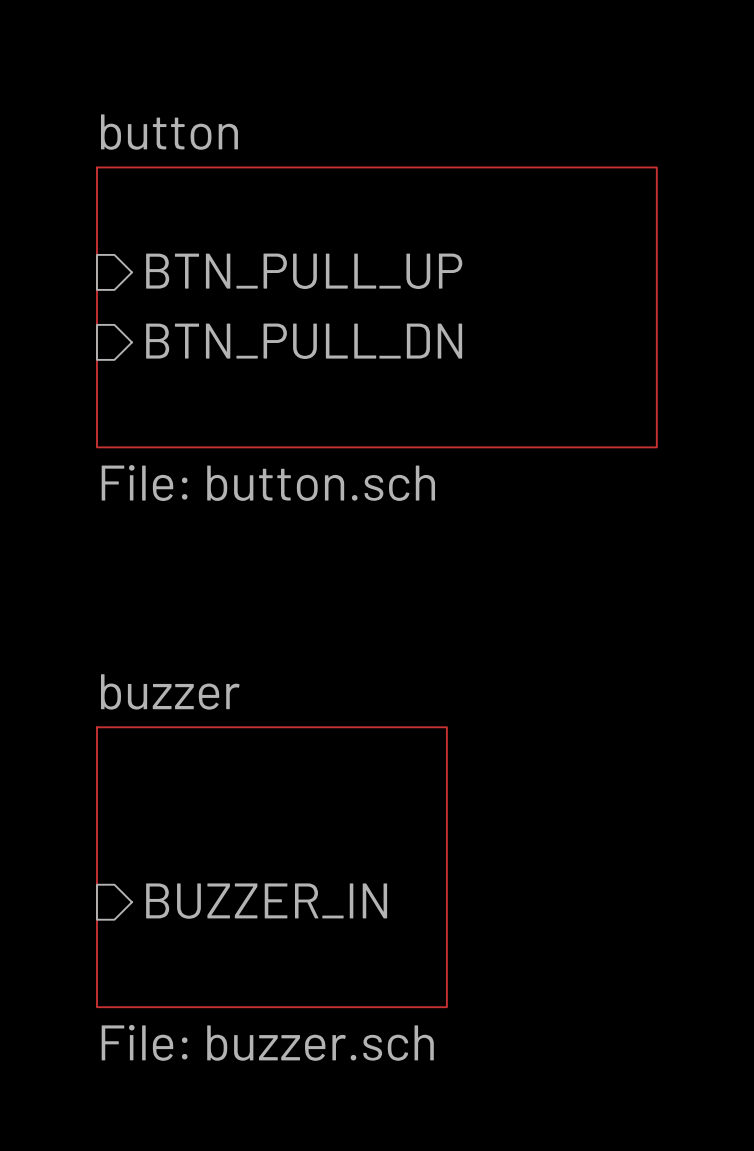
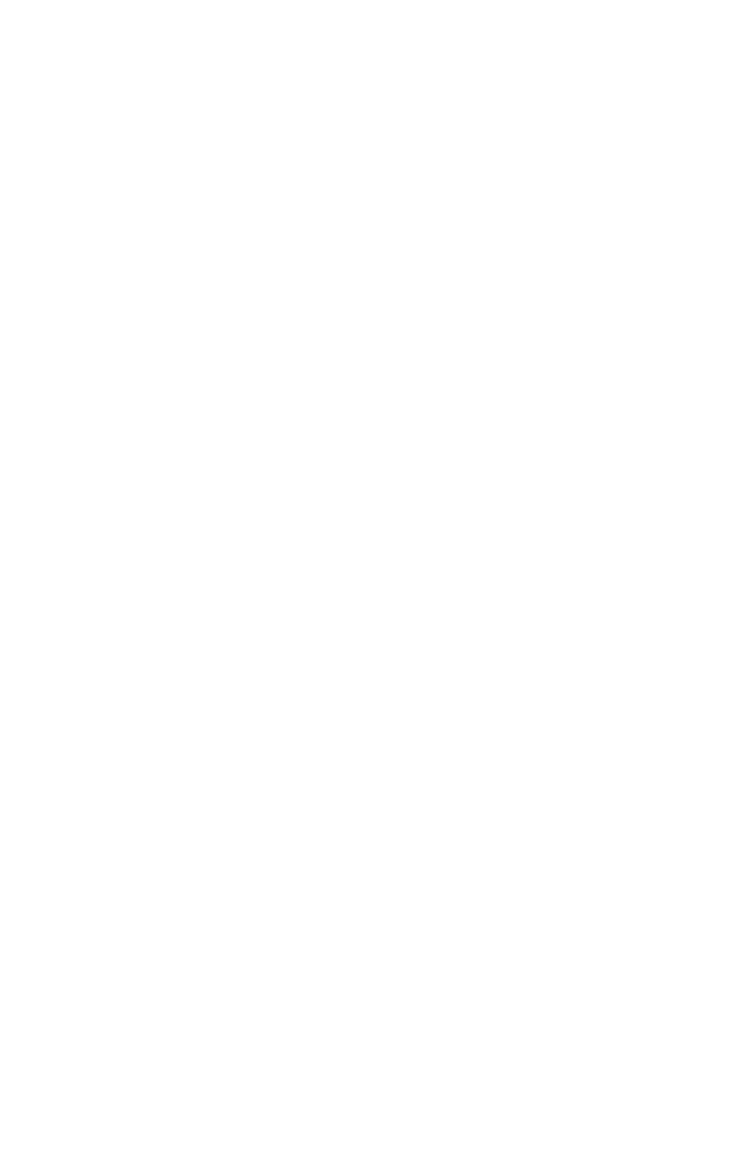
sheet pin: BTN_PULL_UP (304, 271) -> none
sheet button: File: button.sch (376, 307) -> none
sheet pin: BTN_PULL_DN (304, 341) -> none
sheet buzzer: File: buzzer.sch (271, 867) -> none
sheet pin: BUZZER_IN (266, 901) -> none

